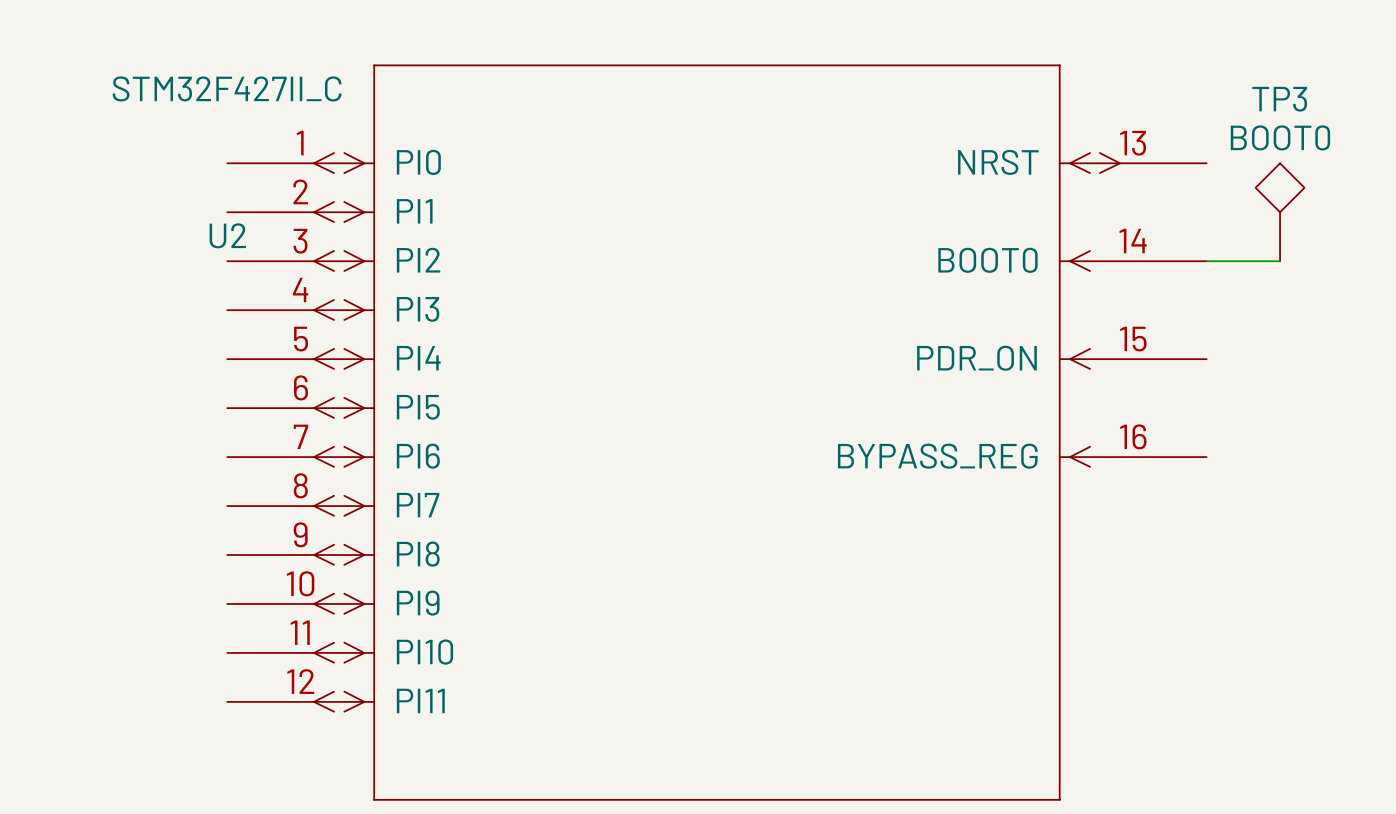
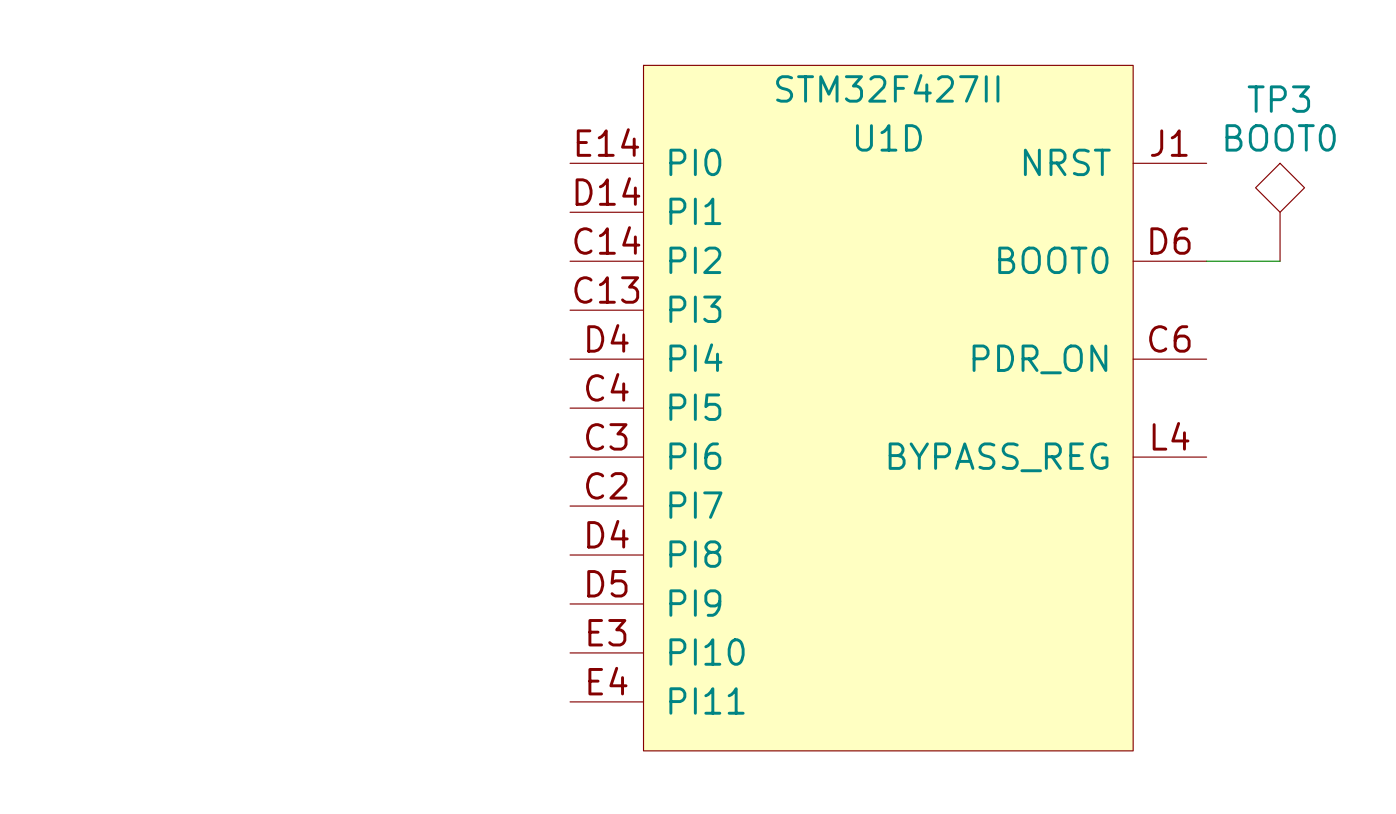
U1D: none -> STM32F427II (888, 408)
U2: STM32F427II_C (716, 432) -> none

